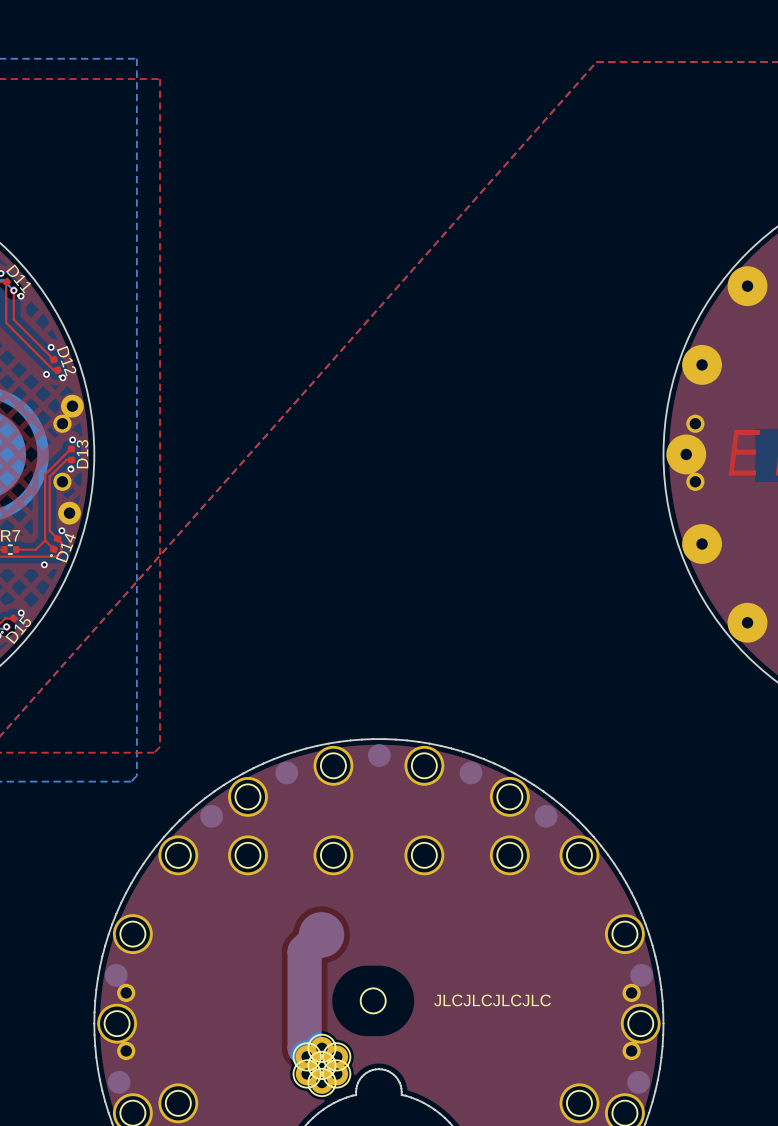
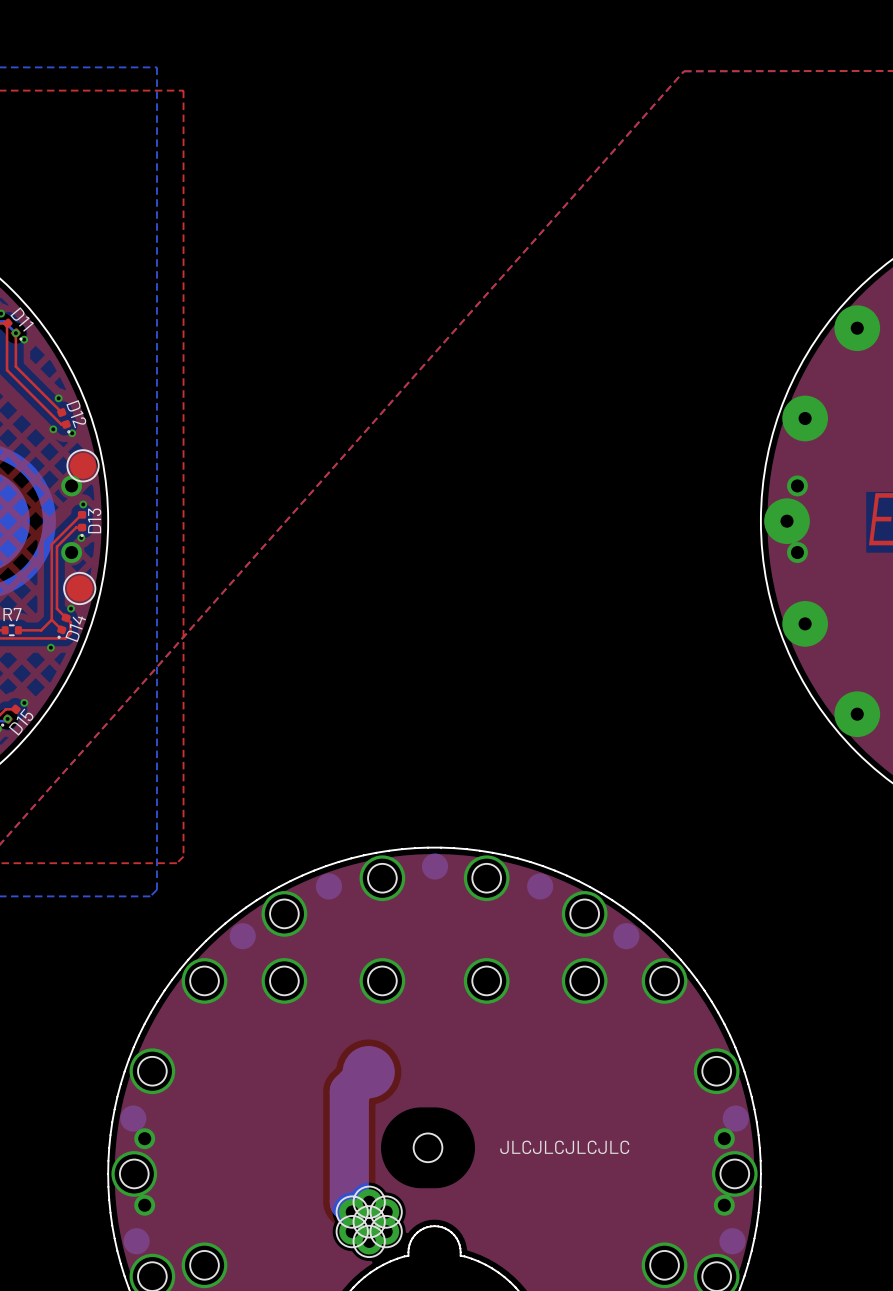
part footprint: [61, 394, 84, 418] -> [66, 449, 100, 483]
part footprint: [58, 501, 81, 525] -> [63, 572, 97, 605]

